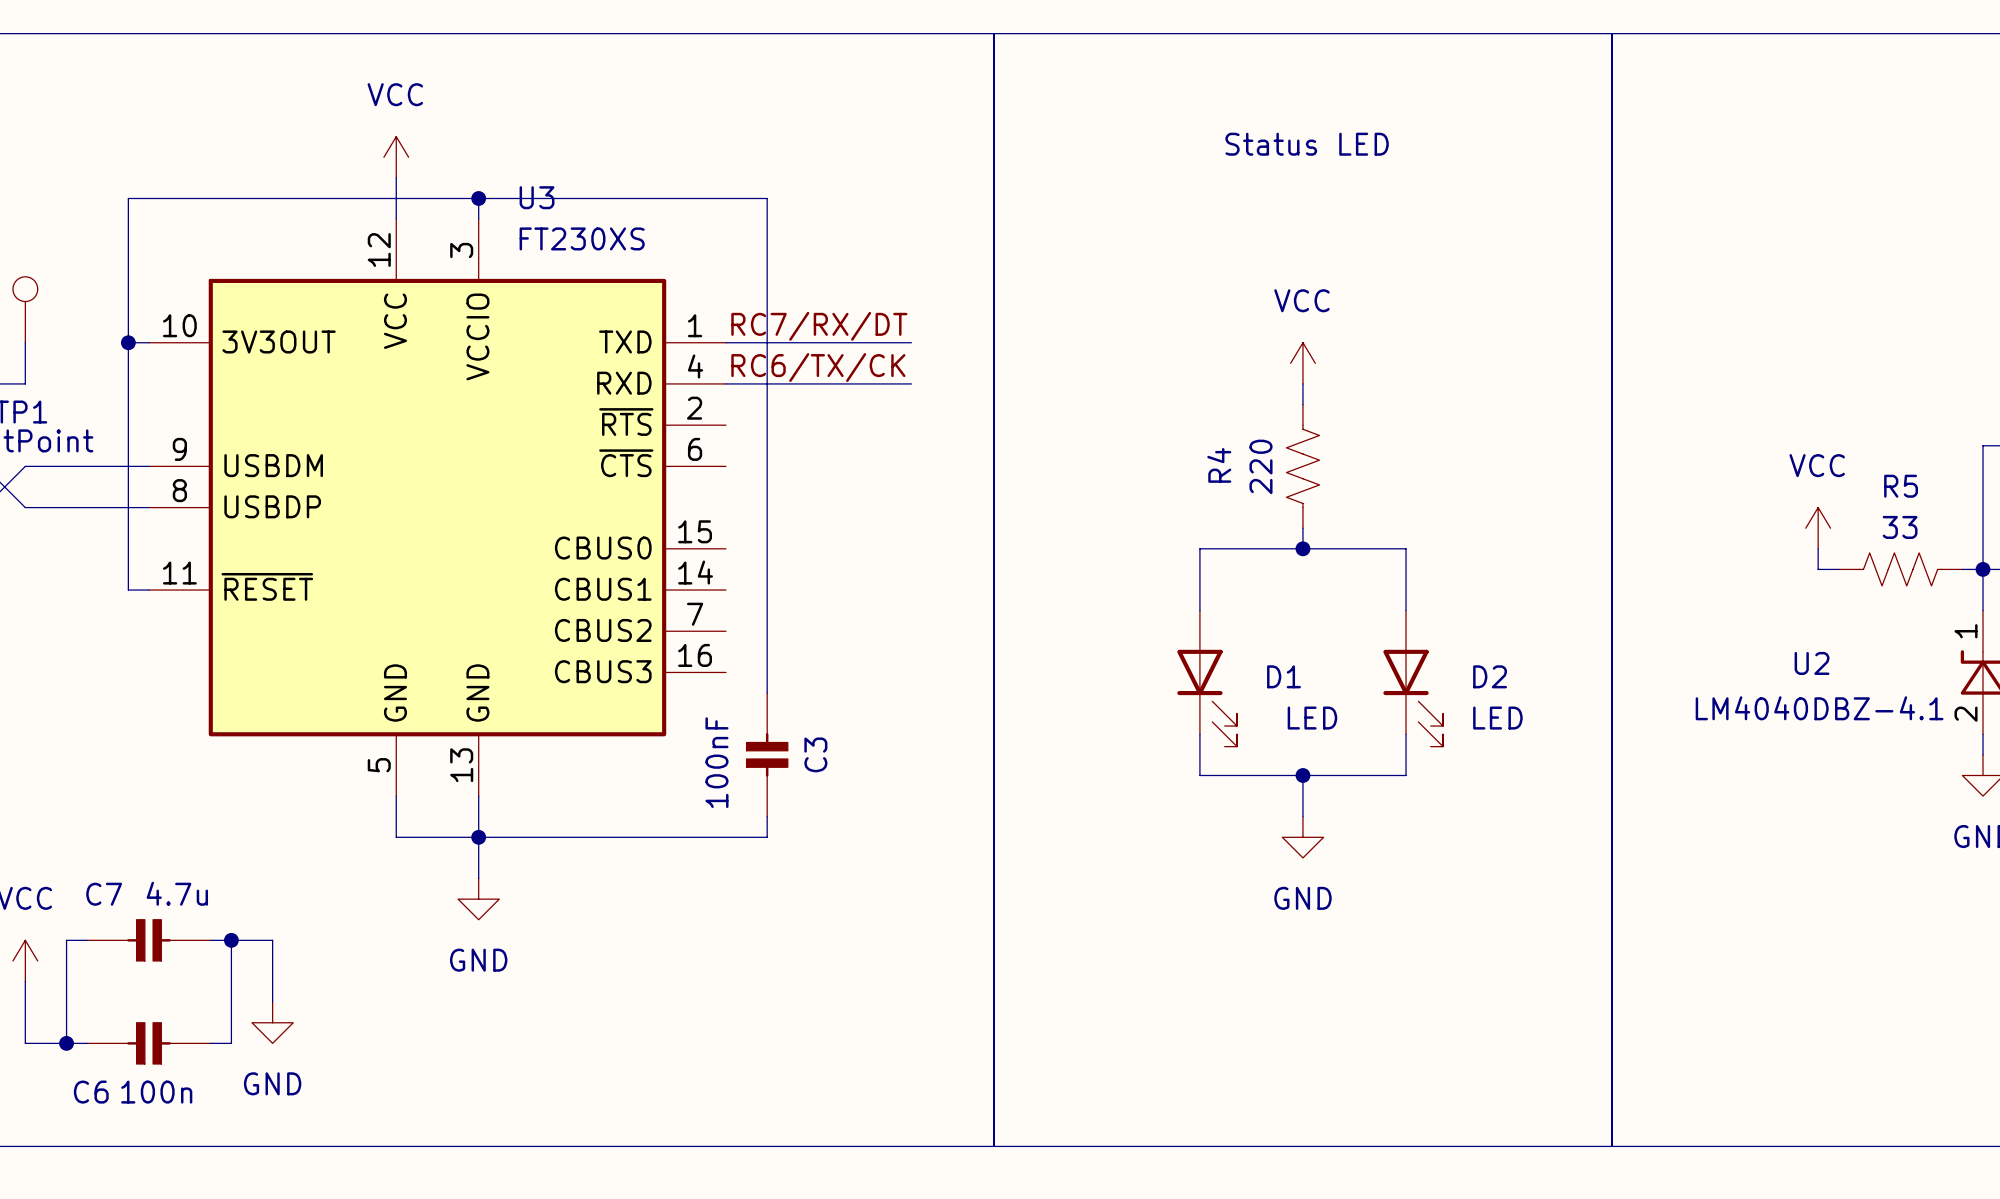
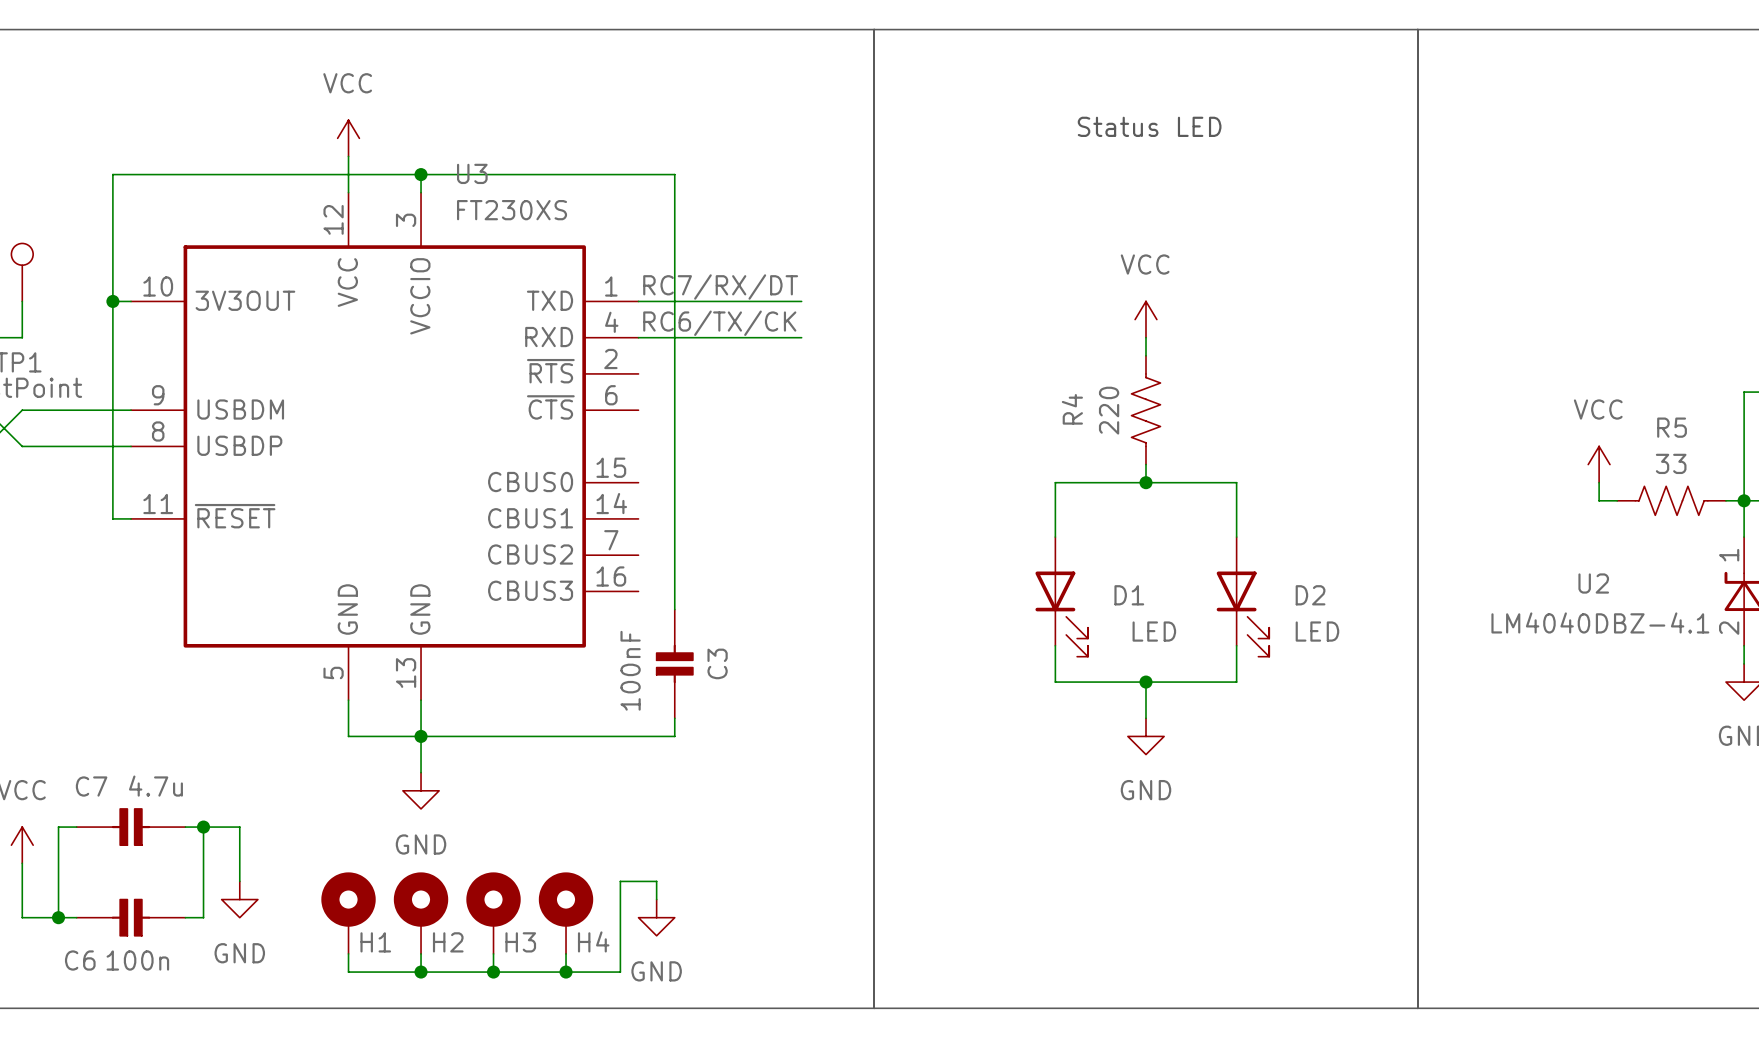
wire: none -> (656, 899) (656, 881) (620, 881) (620, 972) (348, 972) (348, 953)
H1: none -> (348, 913)
H2: none -> (421, 913)
H3: none -> (493, 913)
H4: none -> (566, 913)
power symbol: none -> GND (656, 917)
wire: none -> (421, 953) (421, 972)
wire: none -> (493, 953) (493, 972)
wire: none -> (566, 953) (566, 972)
junction: none -> (421, 972)
junction: none -> (493, 972)
junction: none -> (566, 972)

